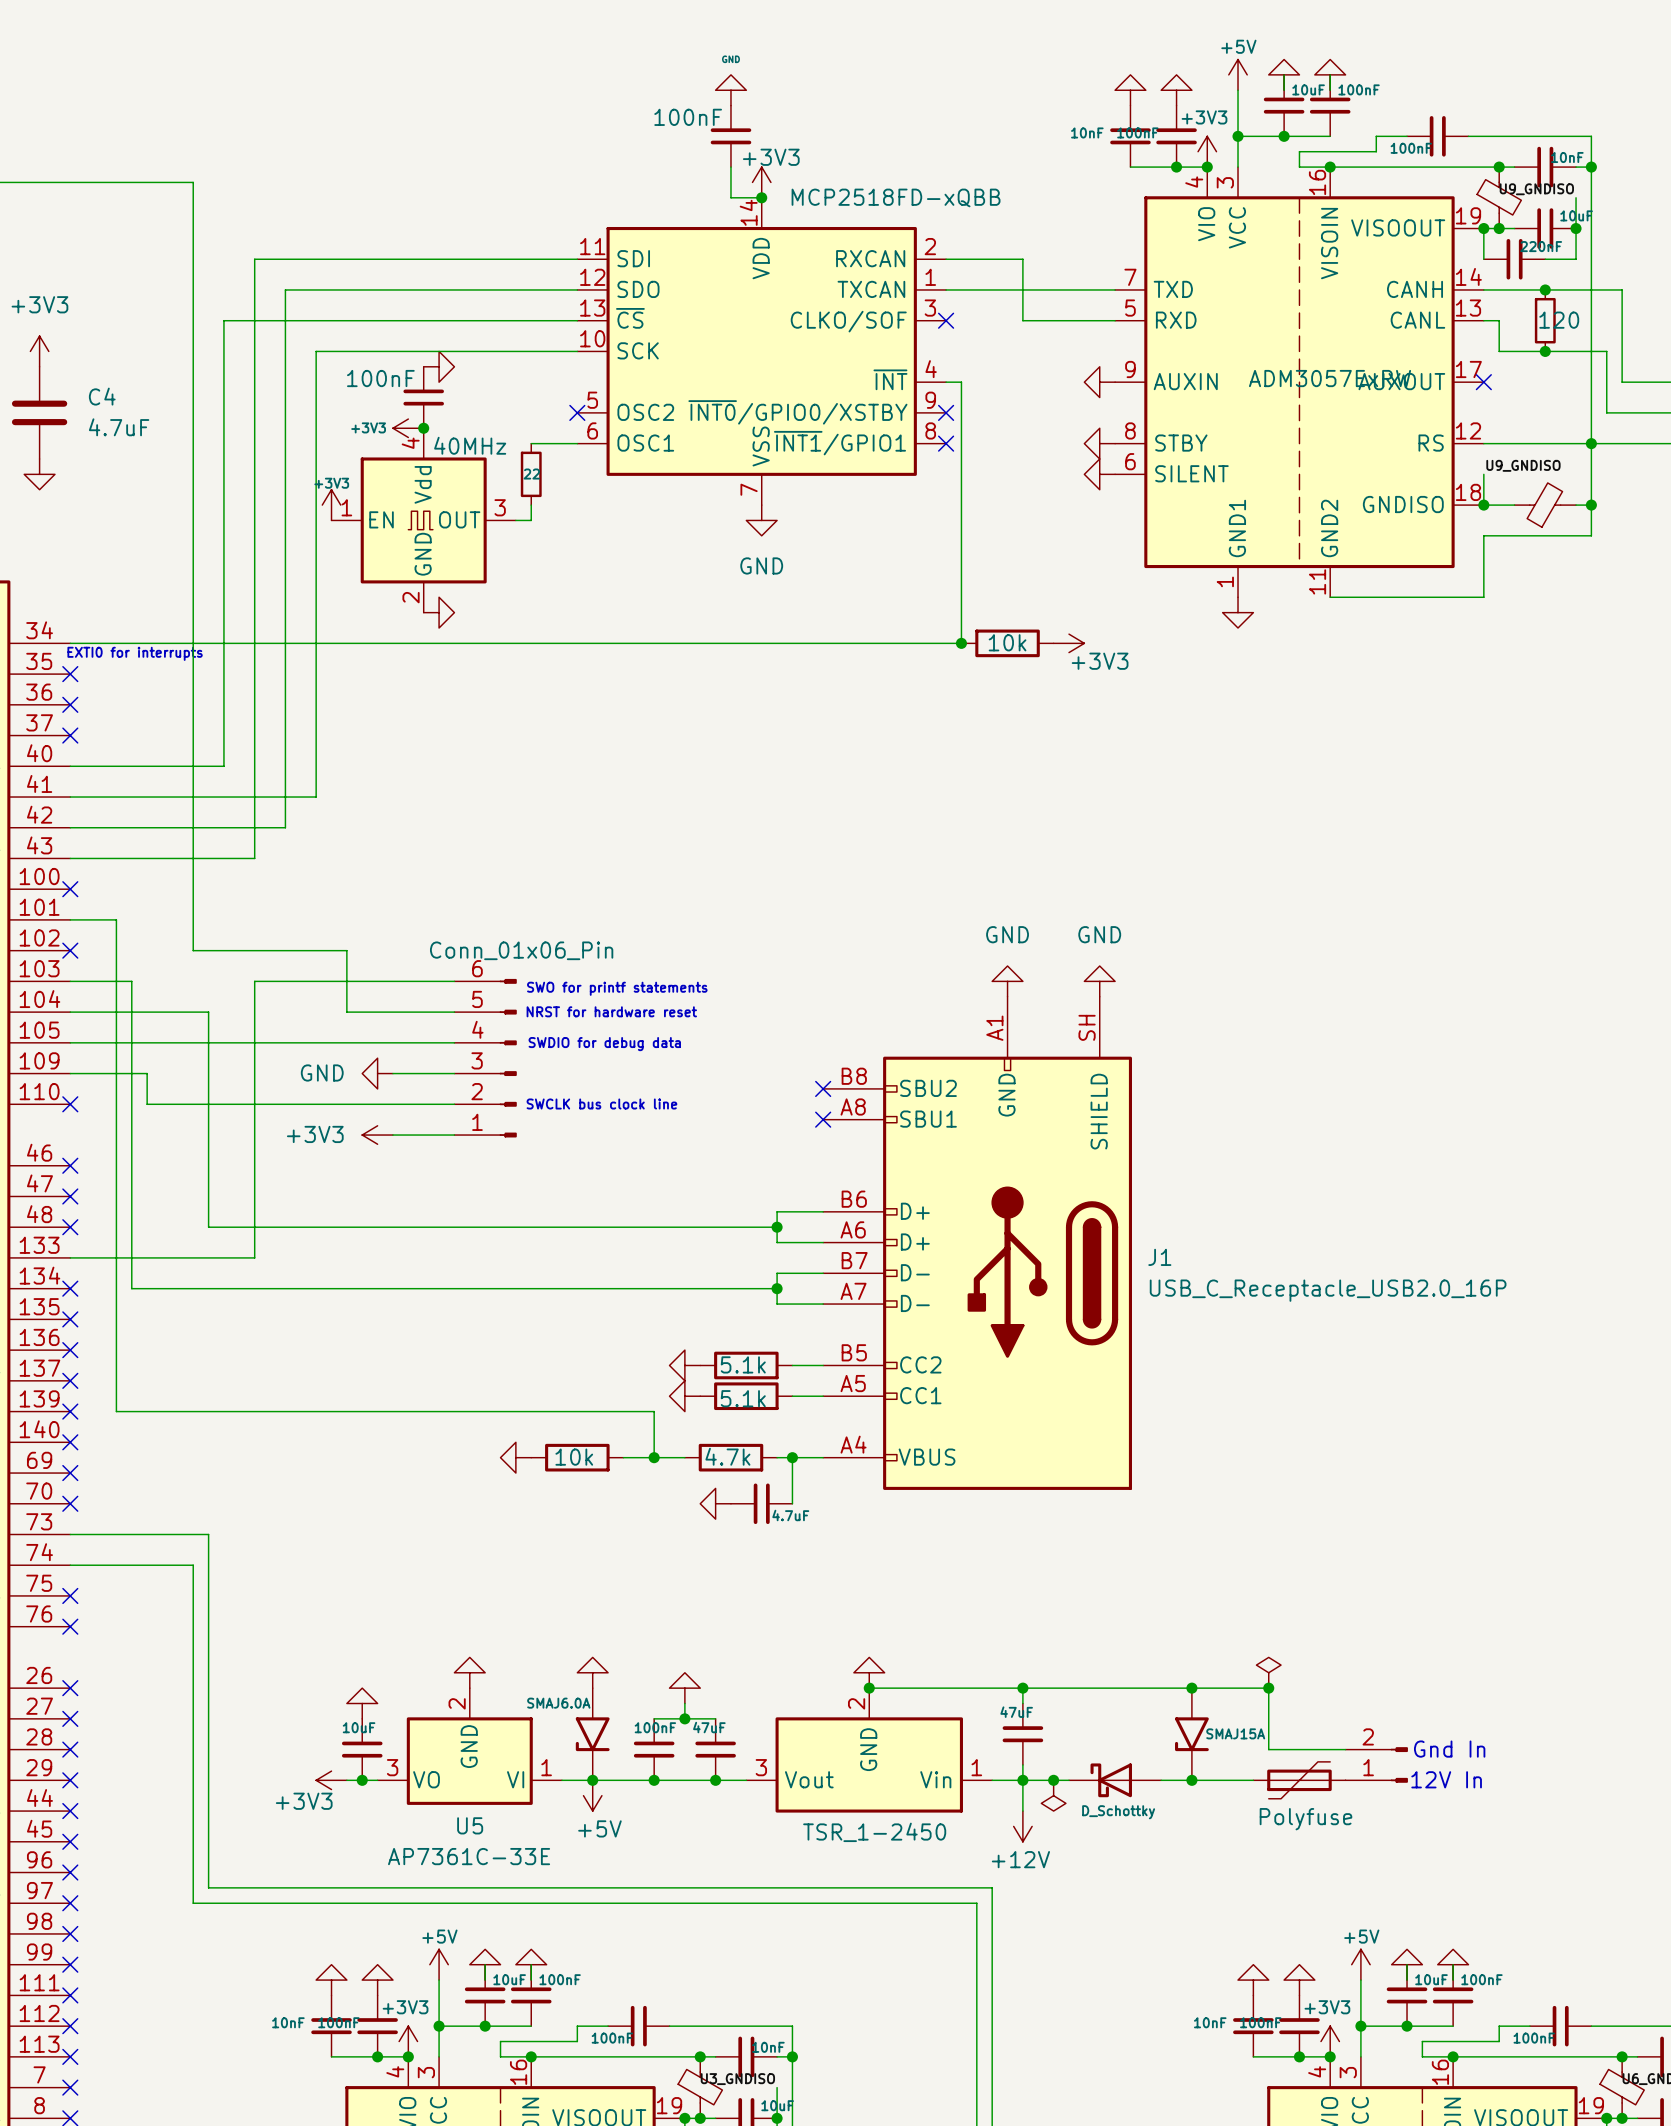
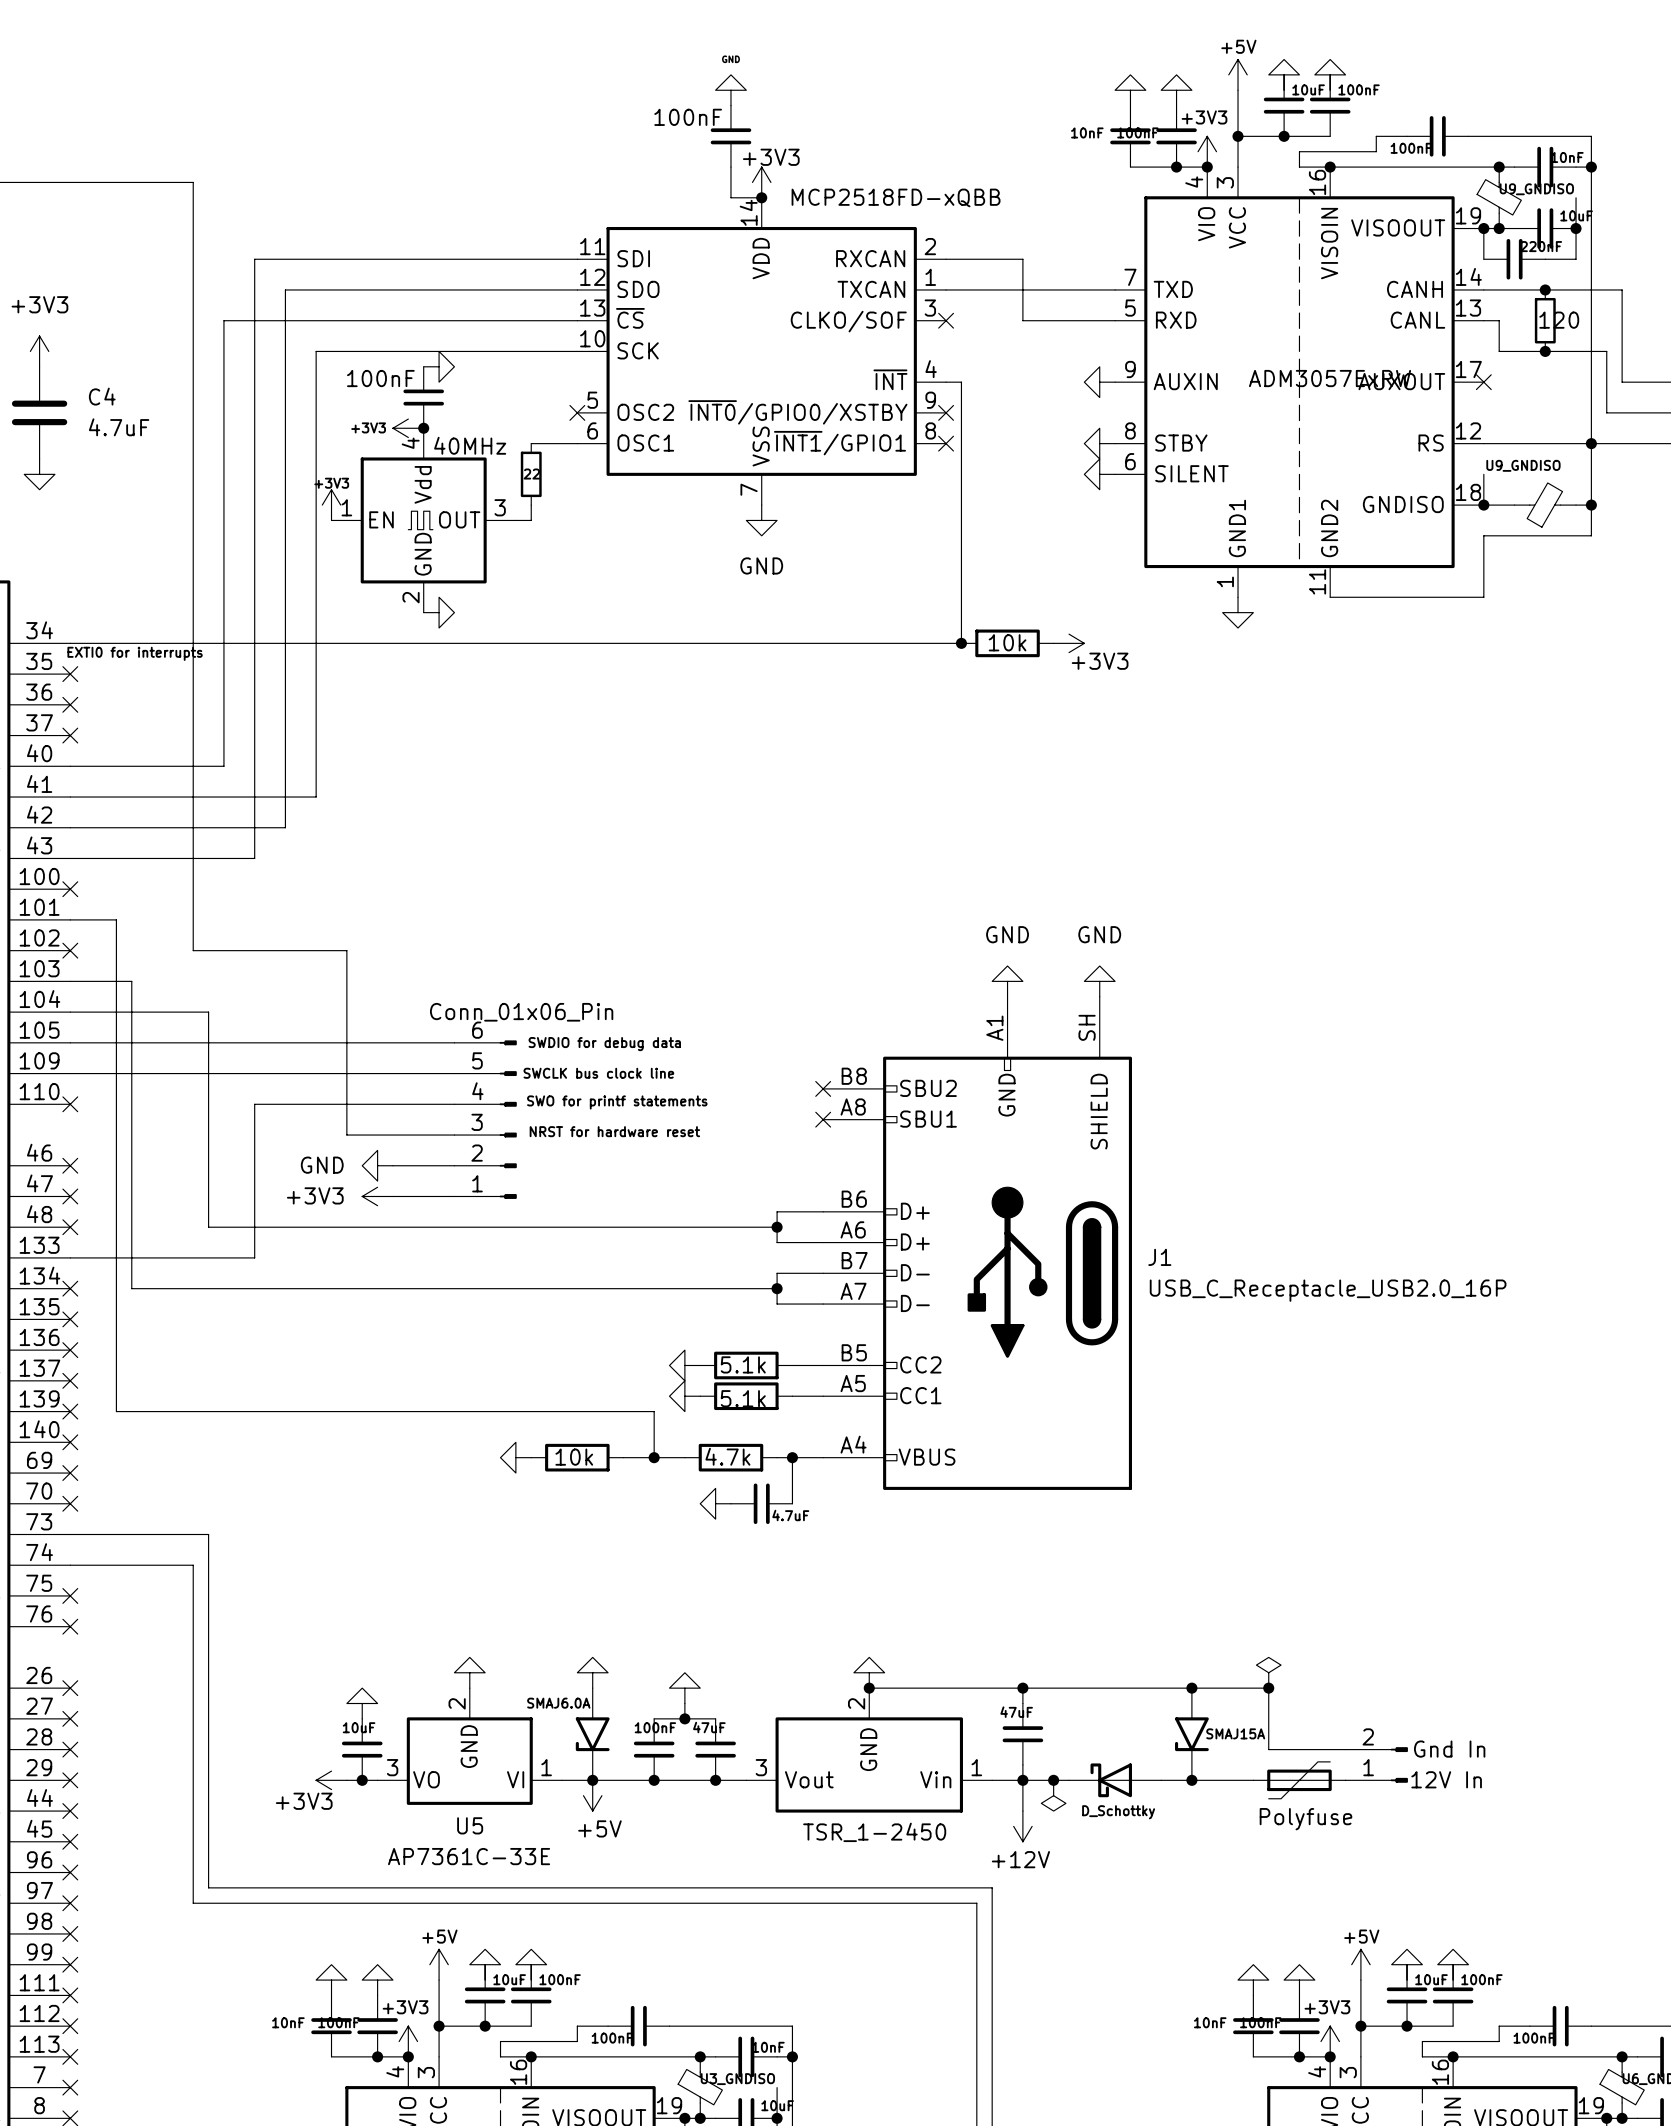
wire: (454, 981) (254, 981) (254, 1104) (147, 1104) (147, 1073) -> (392, 1073) (147, 1073)
text position: SWO for printf statements (617, 988) -> SWO for printf statements (617, 1102)
text position: NRST for hardware reset (611, 1011) -> NRST for hardware reset (614, 1131)
wire: (346, 1012) (454, 1012) -> (346, 1012) (346, 1135) (392, 1135)
part position: (485, 1058) -> (485, 1119)
power symbol position: GND (377, 1073) -> GND (377, 1165)
text position: SWCLK bus clock line (601, 1104) -> SWCLK bus clock line (598, 1073)
power symbol position: +3V3 (377, 1135) -> +3V3 (377, 1196)
wire: none -> (392, 1165) (454, 1165)
wire: none -> (392, 1196) (454, 1196)

